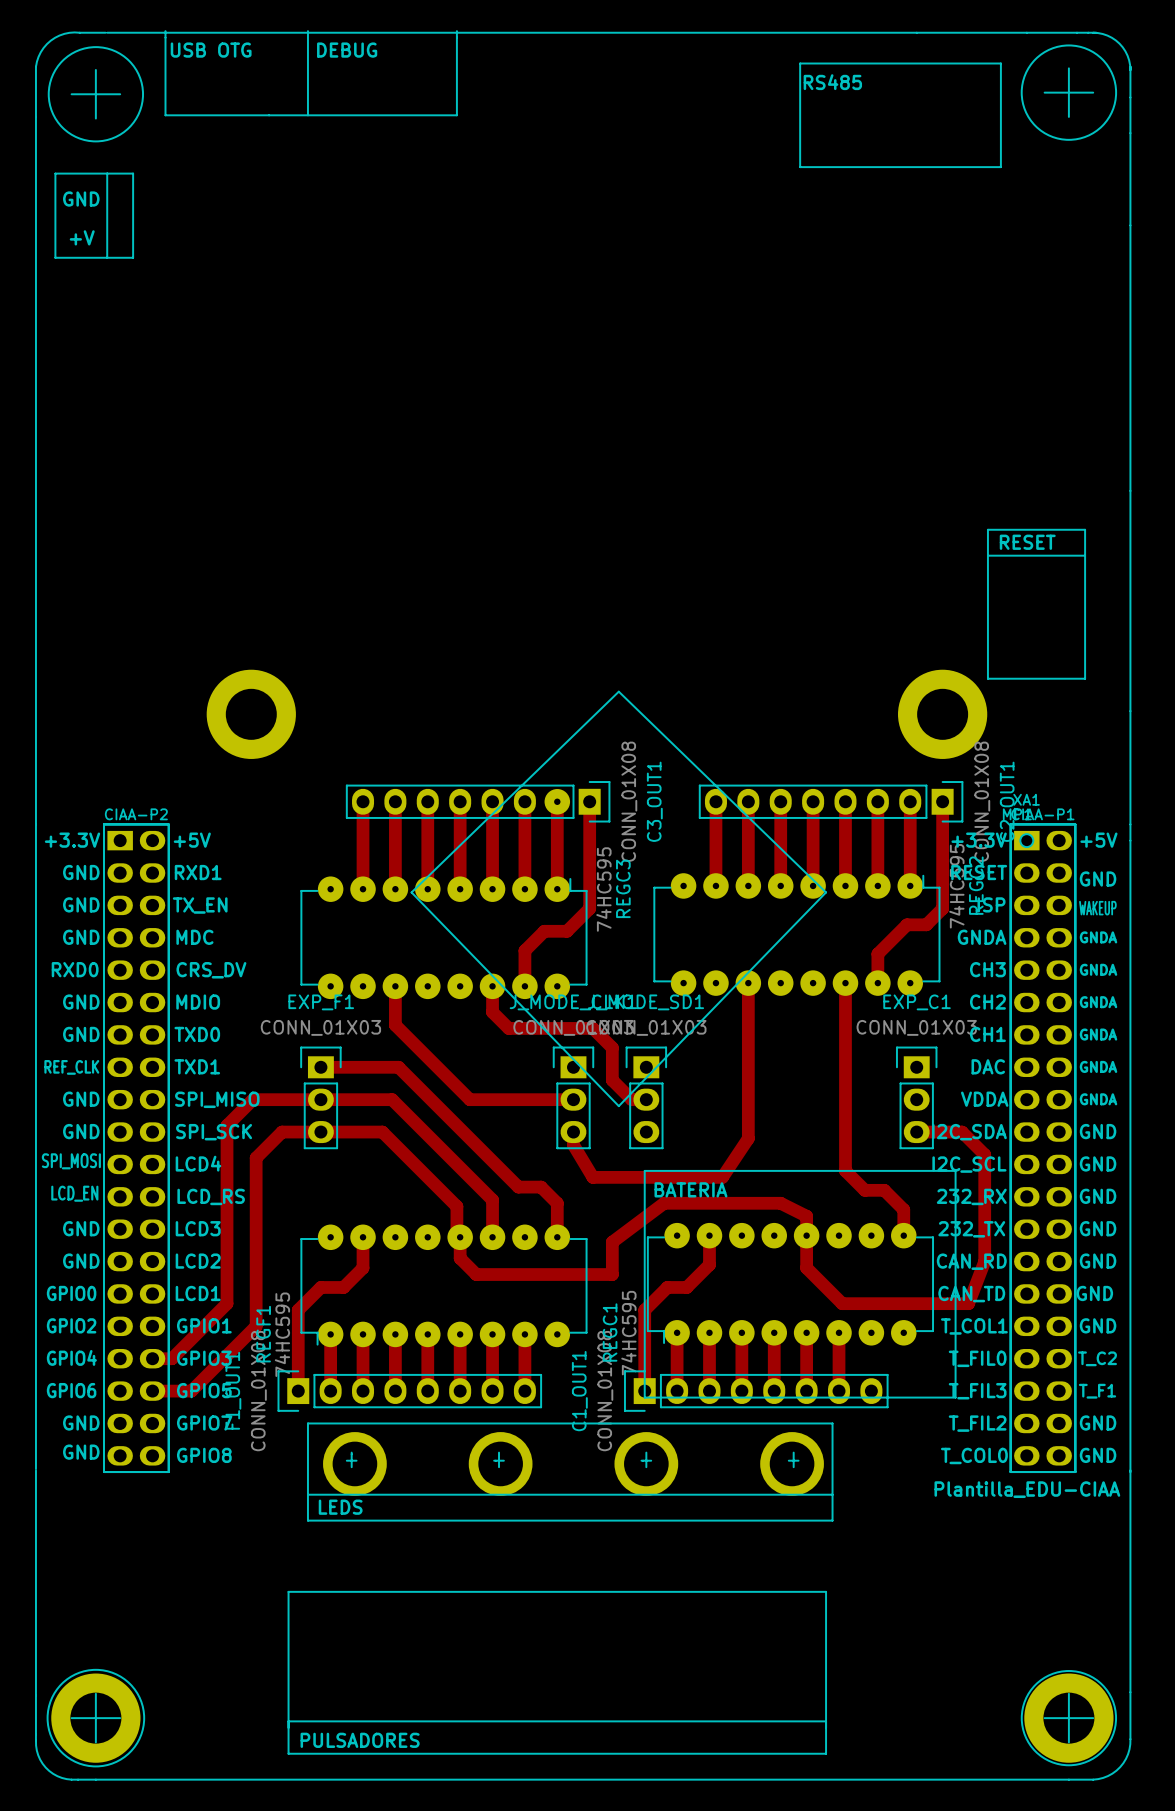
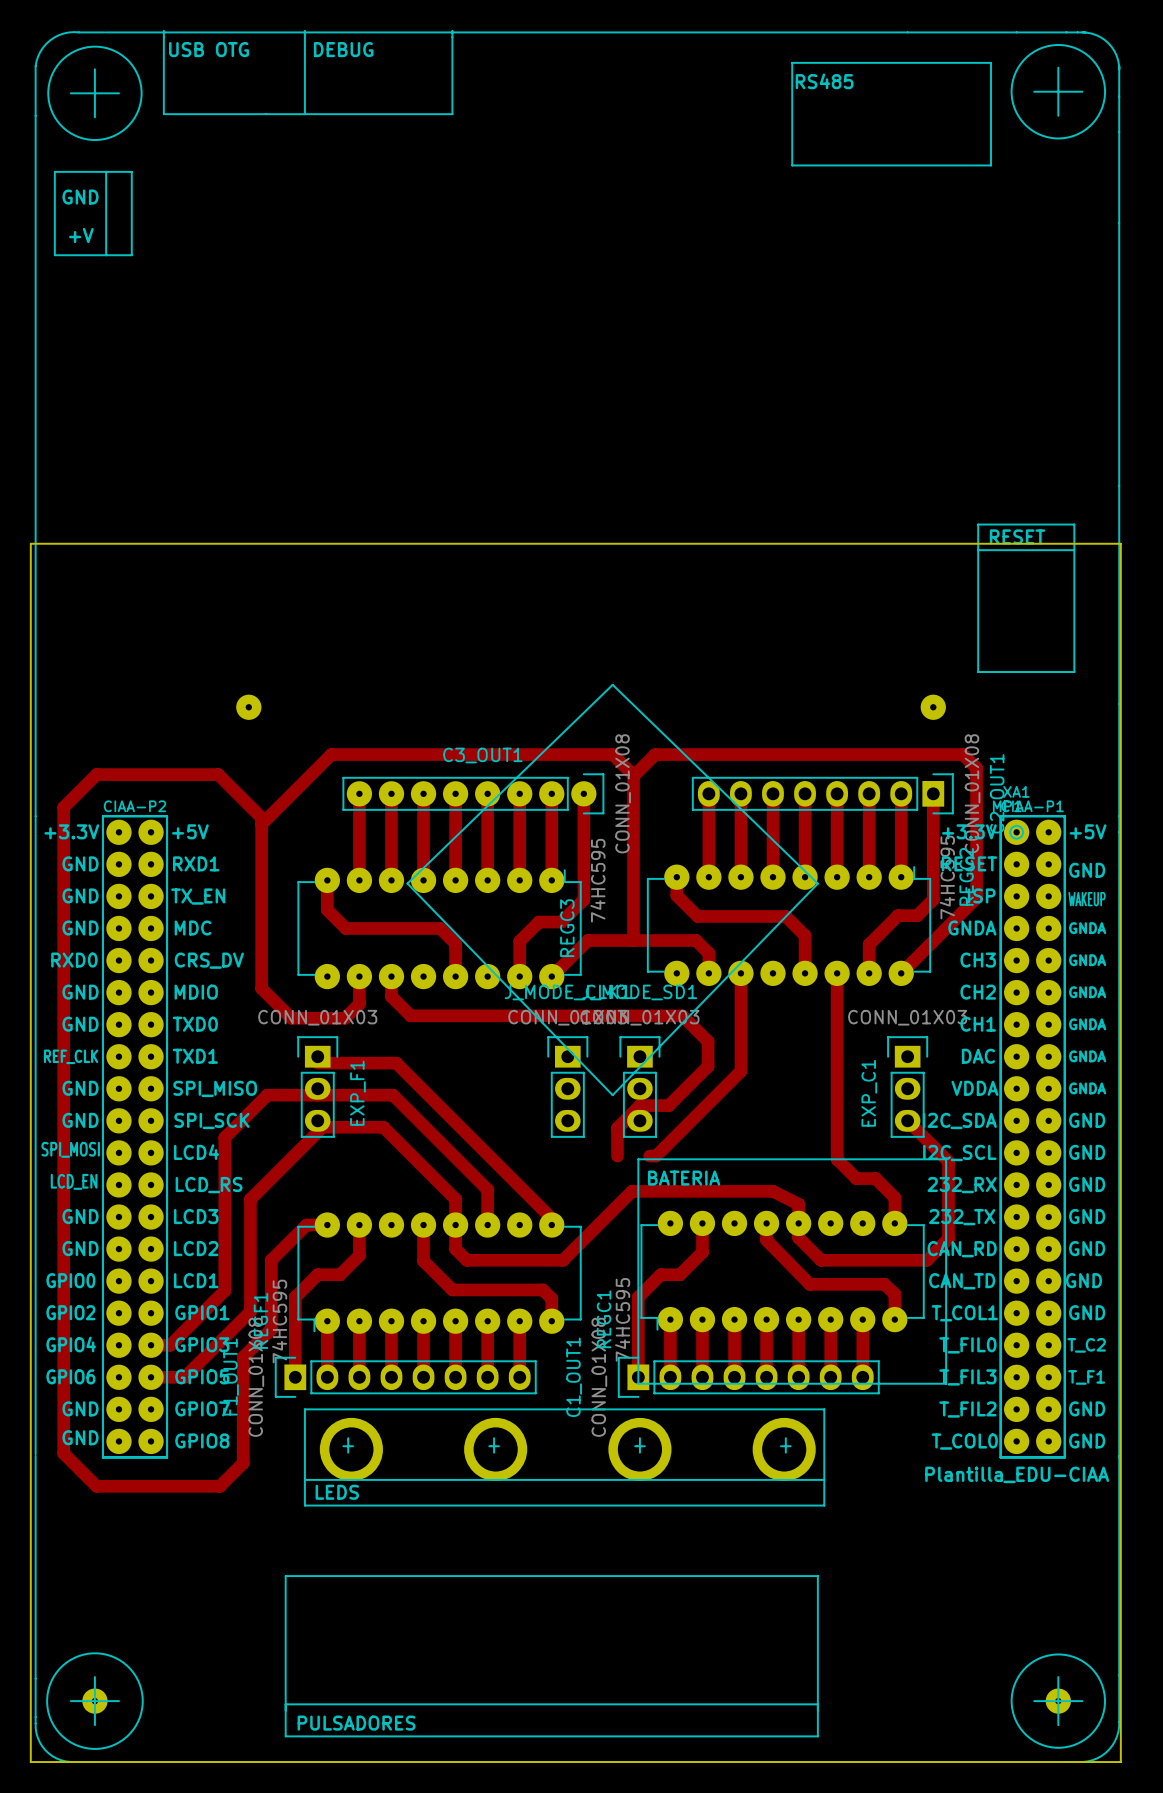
board edge: none -> (30, 543) (30, 1762) (1120, 1762) (1120, 543) (30, 543)
XA1 footprint: [51, 669, 1114, 1763] -> [82, 694, 1071, 1714]
C3_OUT1 footprint: [345, 781, 611, 823] -> [342, 773, 605, 815]
track: none -> (633, 776) (655, 754) (962, 754) (976, 768) (976, 898) (901, 973)
C3_OUT1 name position: C3_OUT1 (654, 801) -> C3_OUT1 (482, 755)
track: none -> (261, 824) (331, 754) (612, 754) (633, 775) (633, 940)
track: none -> (676, 877) (676, 895) (697, 916) (785, 916) (805, 935) (805, 973)
REGC3 name position: REGC3 (623, 888) -> REGC3 (567, 928)
track: none -> (327, 880) (327, 910) (345, 928) (440, 928) (455, 943) (455, 976)
track: none -> (708, 973) (708, 953) (696, 940) (587, 940) (551, 976)
track: none -> (359, 976) (359, 1003) (344, 1018) (291, 1018) (261, 988) (261, 817) (218, 774) (96, 774) (63, 807) (63, 1453) (96, 1486) (219, 1486) (243, 1463) (243, 1357) (271, 1329) (271, 1260) (306, 1225) (327, 1225)
track: (492, 986) (492, 1012) (508, 1028) (592, 1028) (612, 1047) (612, 1080) (631, 1099) (646, 1099) -> none
EXP_F1 name rotation: 0° (321, 1002) -> 90° counterclockwise (357, 1093)
EXP_F1 name position: EXP_F1 (321, 1002) -> EXP_F1 (357, 1093)
EXP_C1 name rotation: 0° (917, 1002) -> 90° counterclockwise (869, 1093)
EXP_C1 name position: EXP_C1 (917, 1002) -> EXP_C1 (869, 1093)
track: (395, 1006) (395, 1025) (469, 1099) (573, 1099) -> (391, 996) (410, 1015) (682, 1015) (708, 1041) (708, 1066) (668, 1105) (639, 1105) (617, 1128) (617, 1156)
track: (320, 1067) (398, 1067) (518, 1187) (541, 1187) (557, 1203) (557, 1230) -> (317, 1063) (396, 1063) (551, 1218)
track: (748, 1081) (748, 1138) (722, 1177) (592, 1177) (573, 1145) (573, 1132) -> (740, 1071) (655, 1156) (649, 1156)
track: (916, 1132) (962, 1132) (984, 1154) (984, 1261) (968, 1303) (842, 1303) (806, 1268) (806, 1250) -> (907, 1120) (948, 1161) (948, 1238) (926, 1260) (821, 1260) (798, 1237)
track: (227, 1149) (227, 1125) (252, 1099) (392, 1099) (492, 1201) -> (224, 1137) (267, 1095) (393, 1095) (487, 1189)
track: (664, 1203) (612, 1242) (612, 1274) (476, 1274) (460, 1258) -> (657, 1191) (631, 1191) (563, 1260) (466, 1260) (455, 1249) (455, 1245)
track: (456, 1234) (456, 1206) (382, 1132) (282, 1132) (256, 1157) (256, 1326) (191, 1391) (186, 1391) -> (455, 1225) (455, 1199) (383, 1127) (317, 1127) (317, 1132) (250, 1199) (250, 1311) (184, 1377)
track: none -> (766, 1223) (766, 1240) (809, 1284) (884, 1284) (894, 1293) (894, 1319)
track: none -> (423, 1225) (423, 1261) (452, 1289) (542, 1289) (551, 1298) (551, 1321)
track: none -> (862, 1319) (862, 1377)

